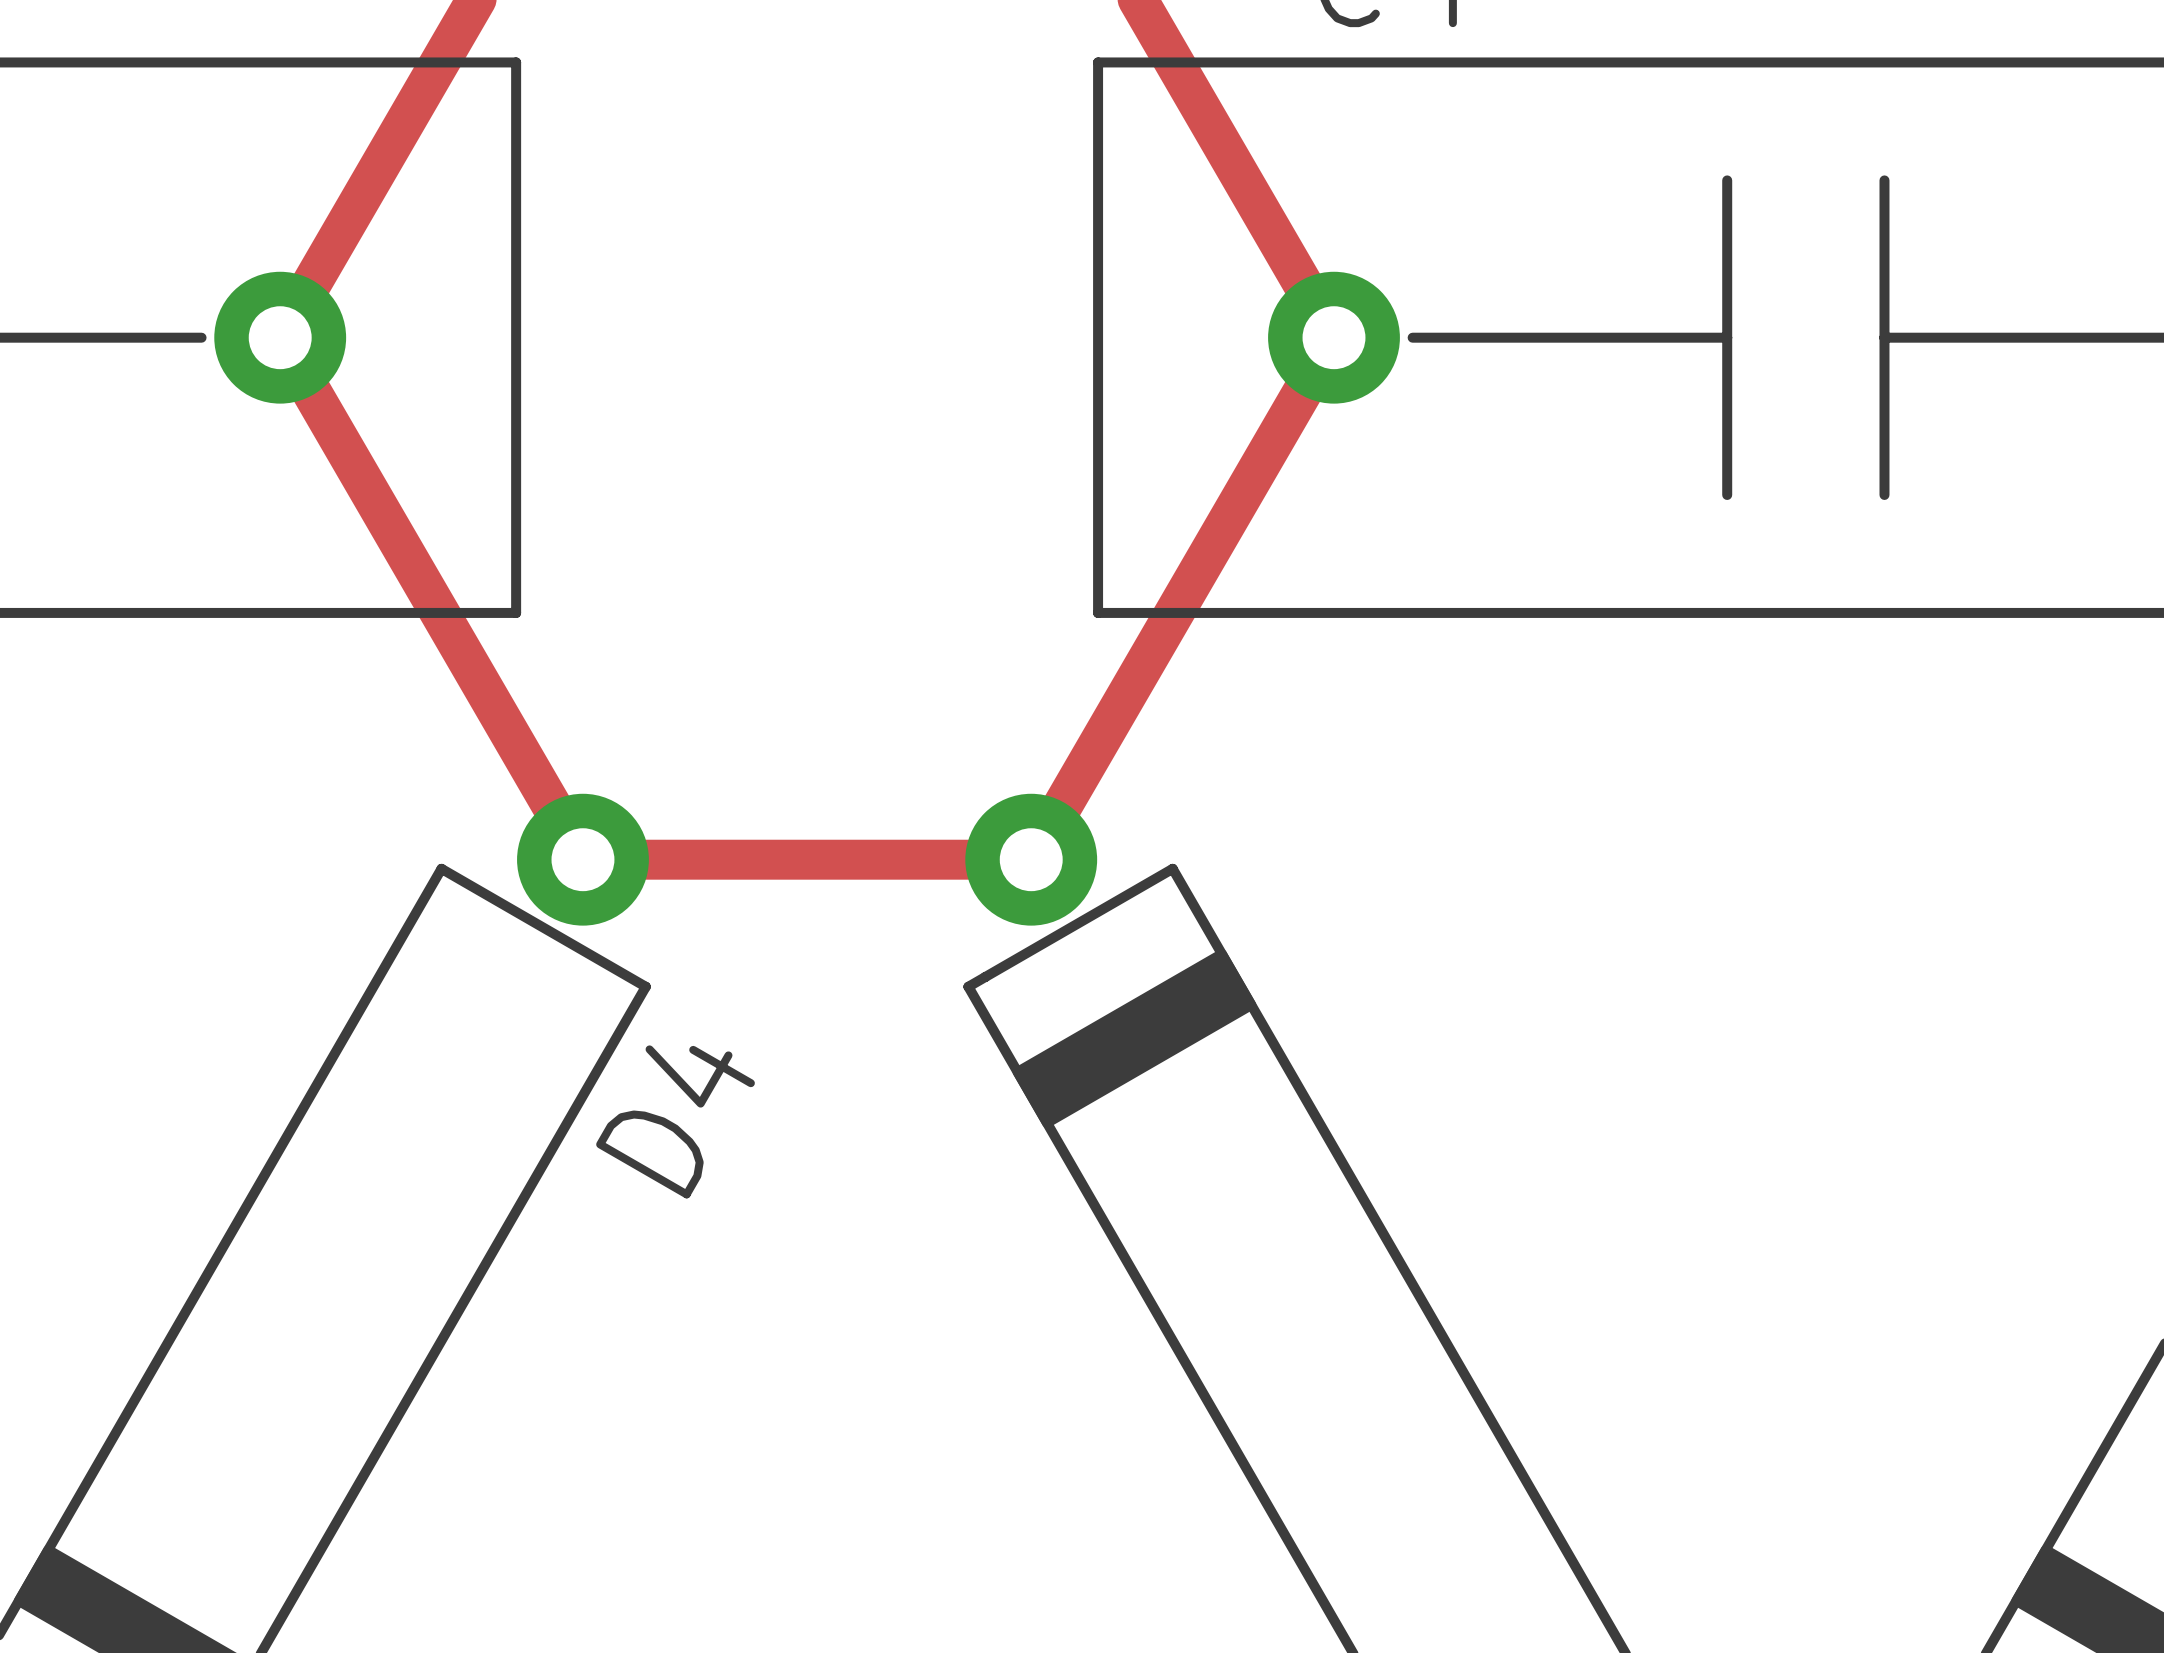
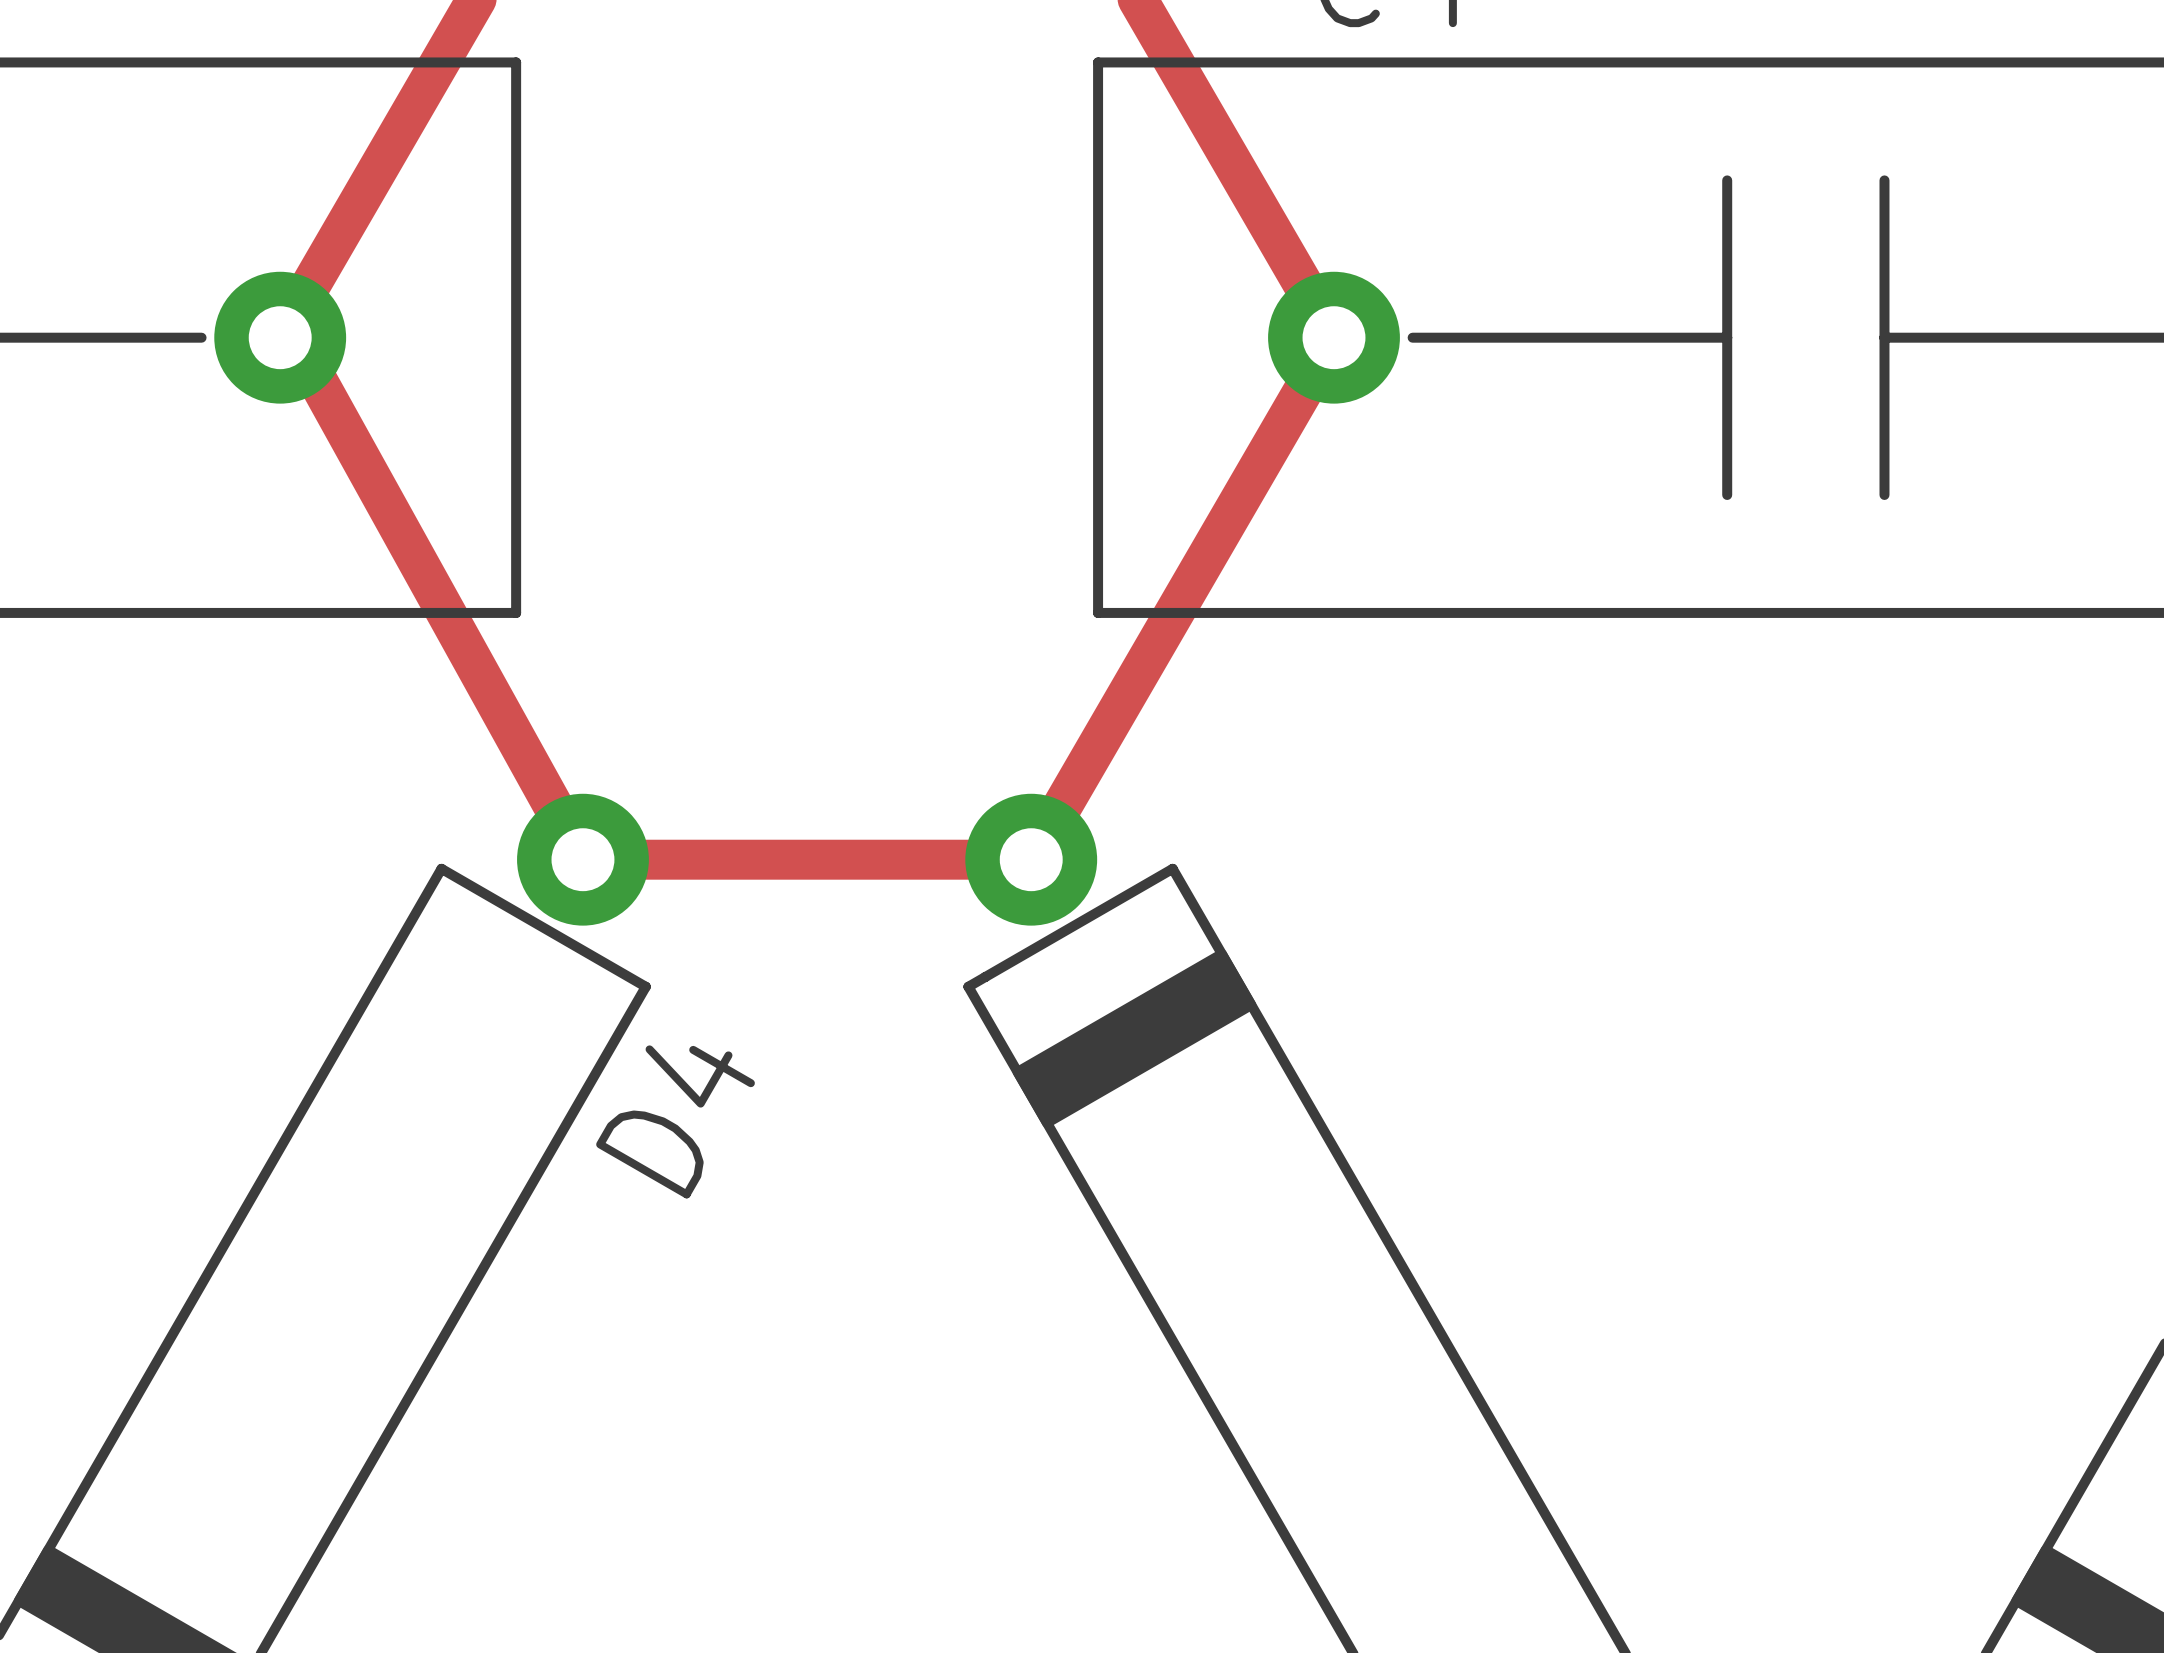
track: (280, 337) (582, 859) -> (287, 325) (582, 859)

